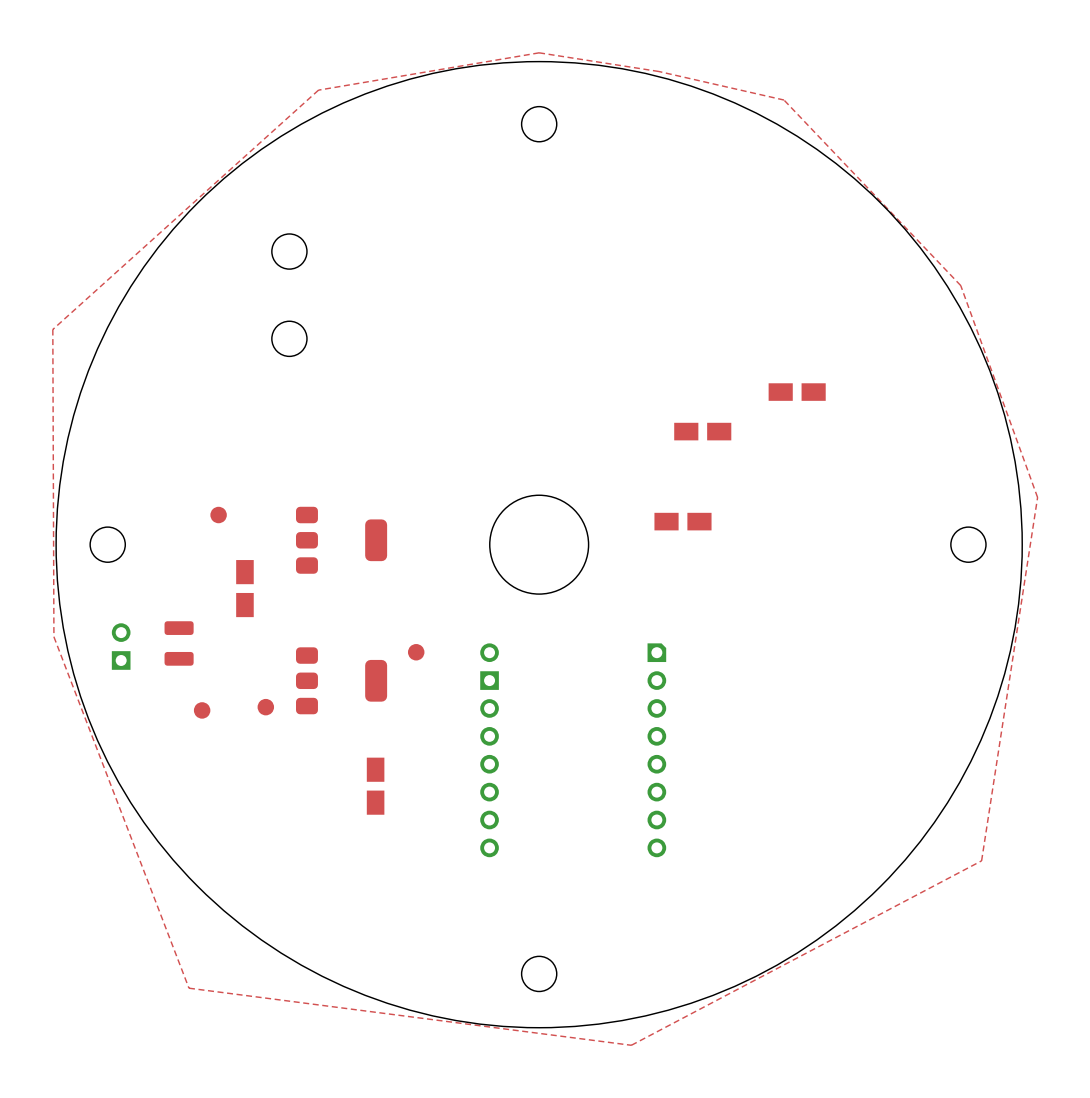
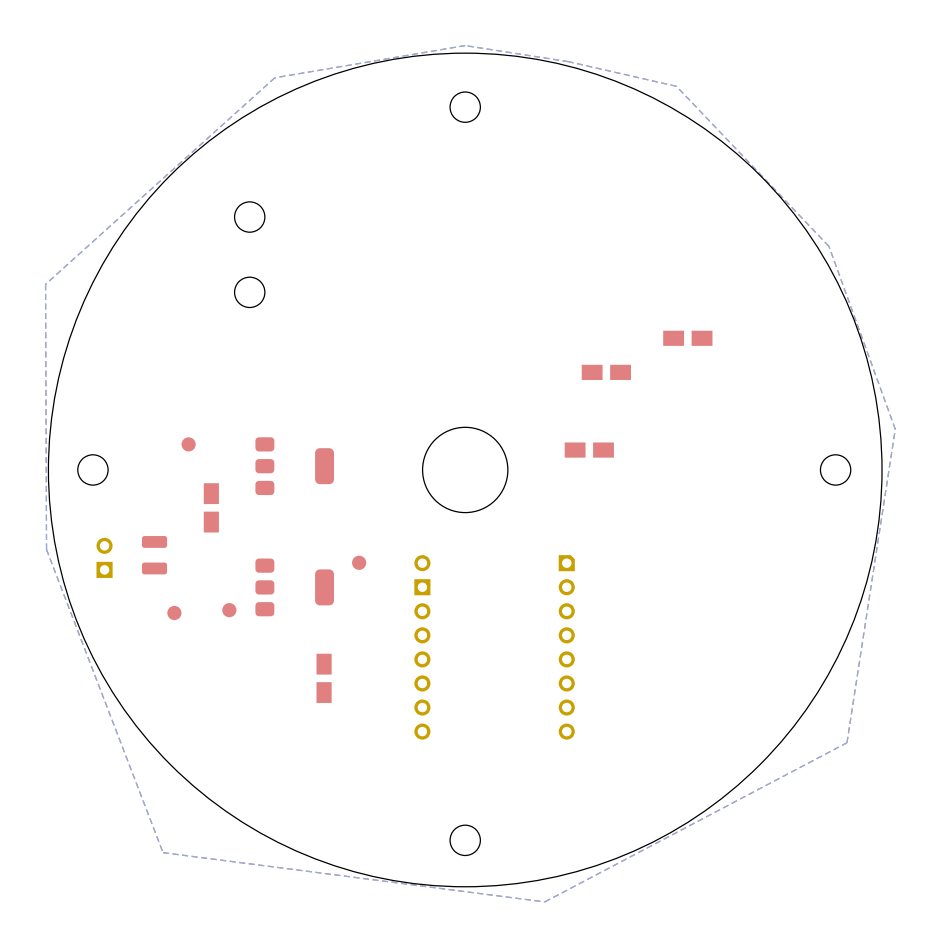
bottom zone outline: none -> (465, 45) (274, 77) (45, 284) (46, 549) (163, 852) (544, 901) (846, 742) (895, 429) (828, 246) (676, 86) (568, 61) (465, 45)

